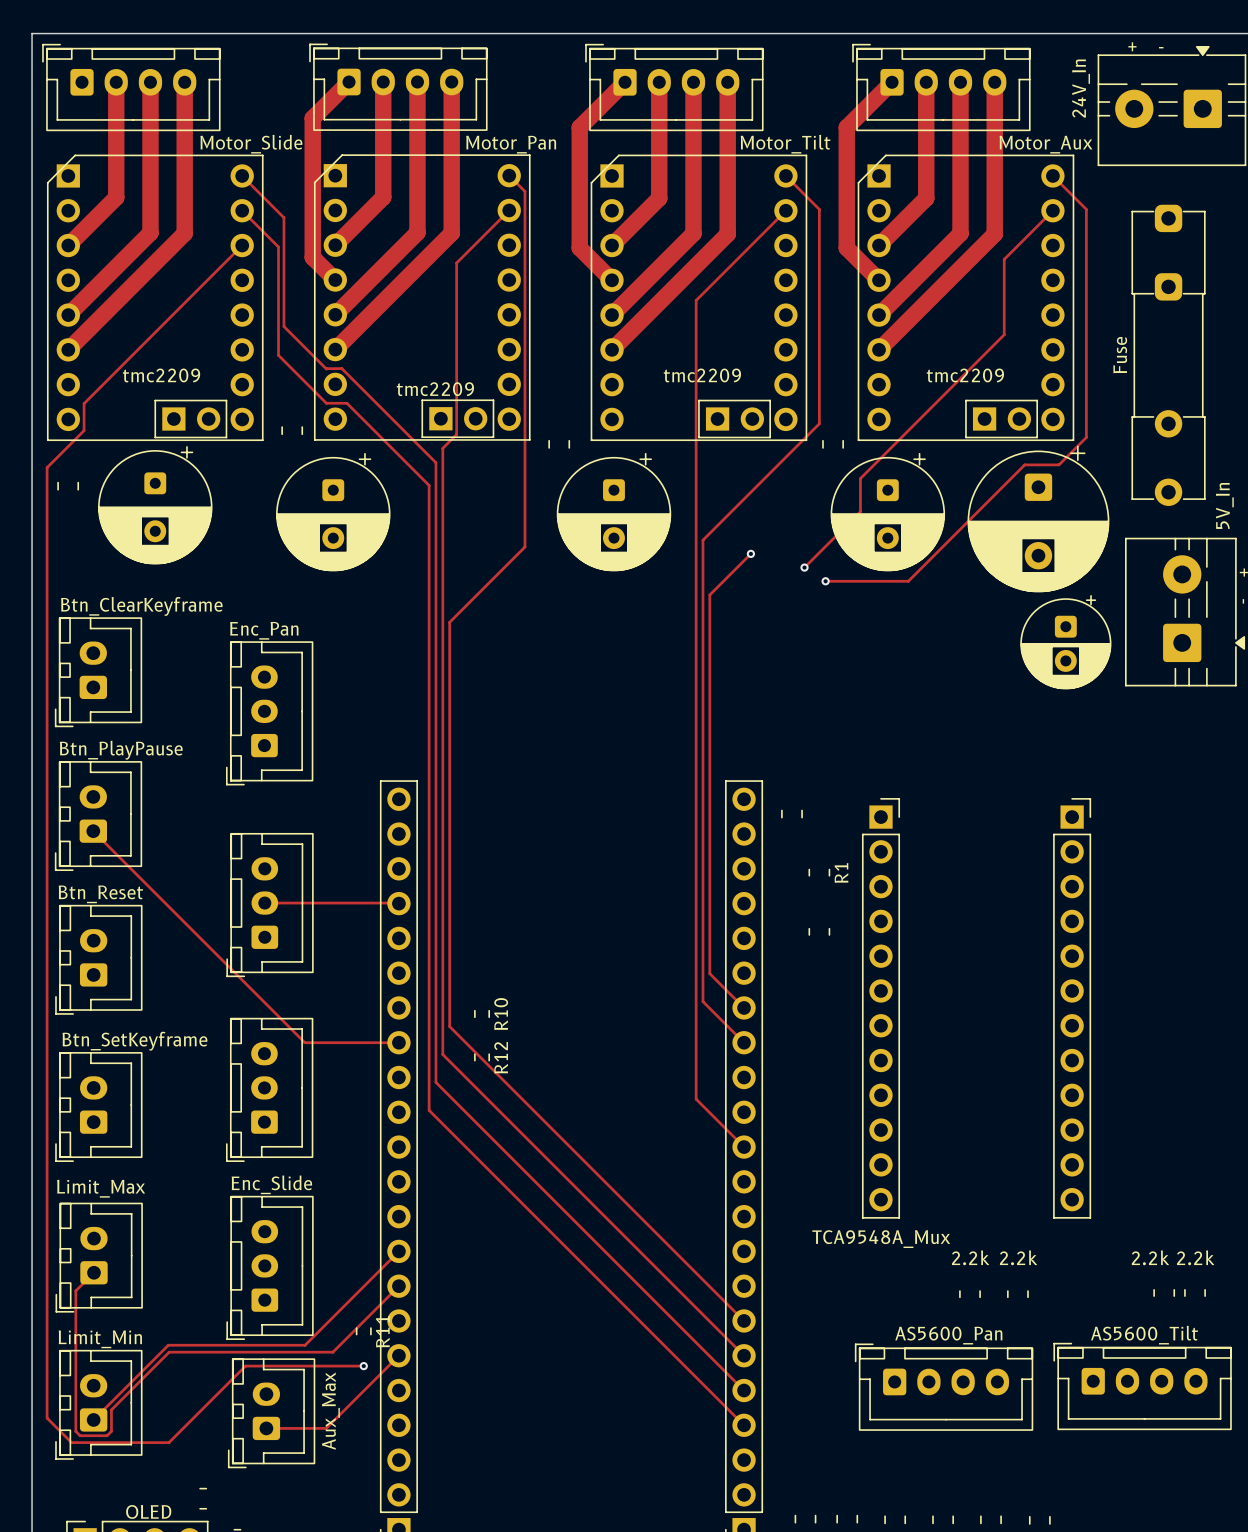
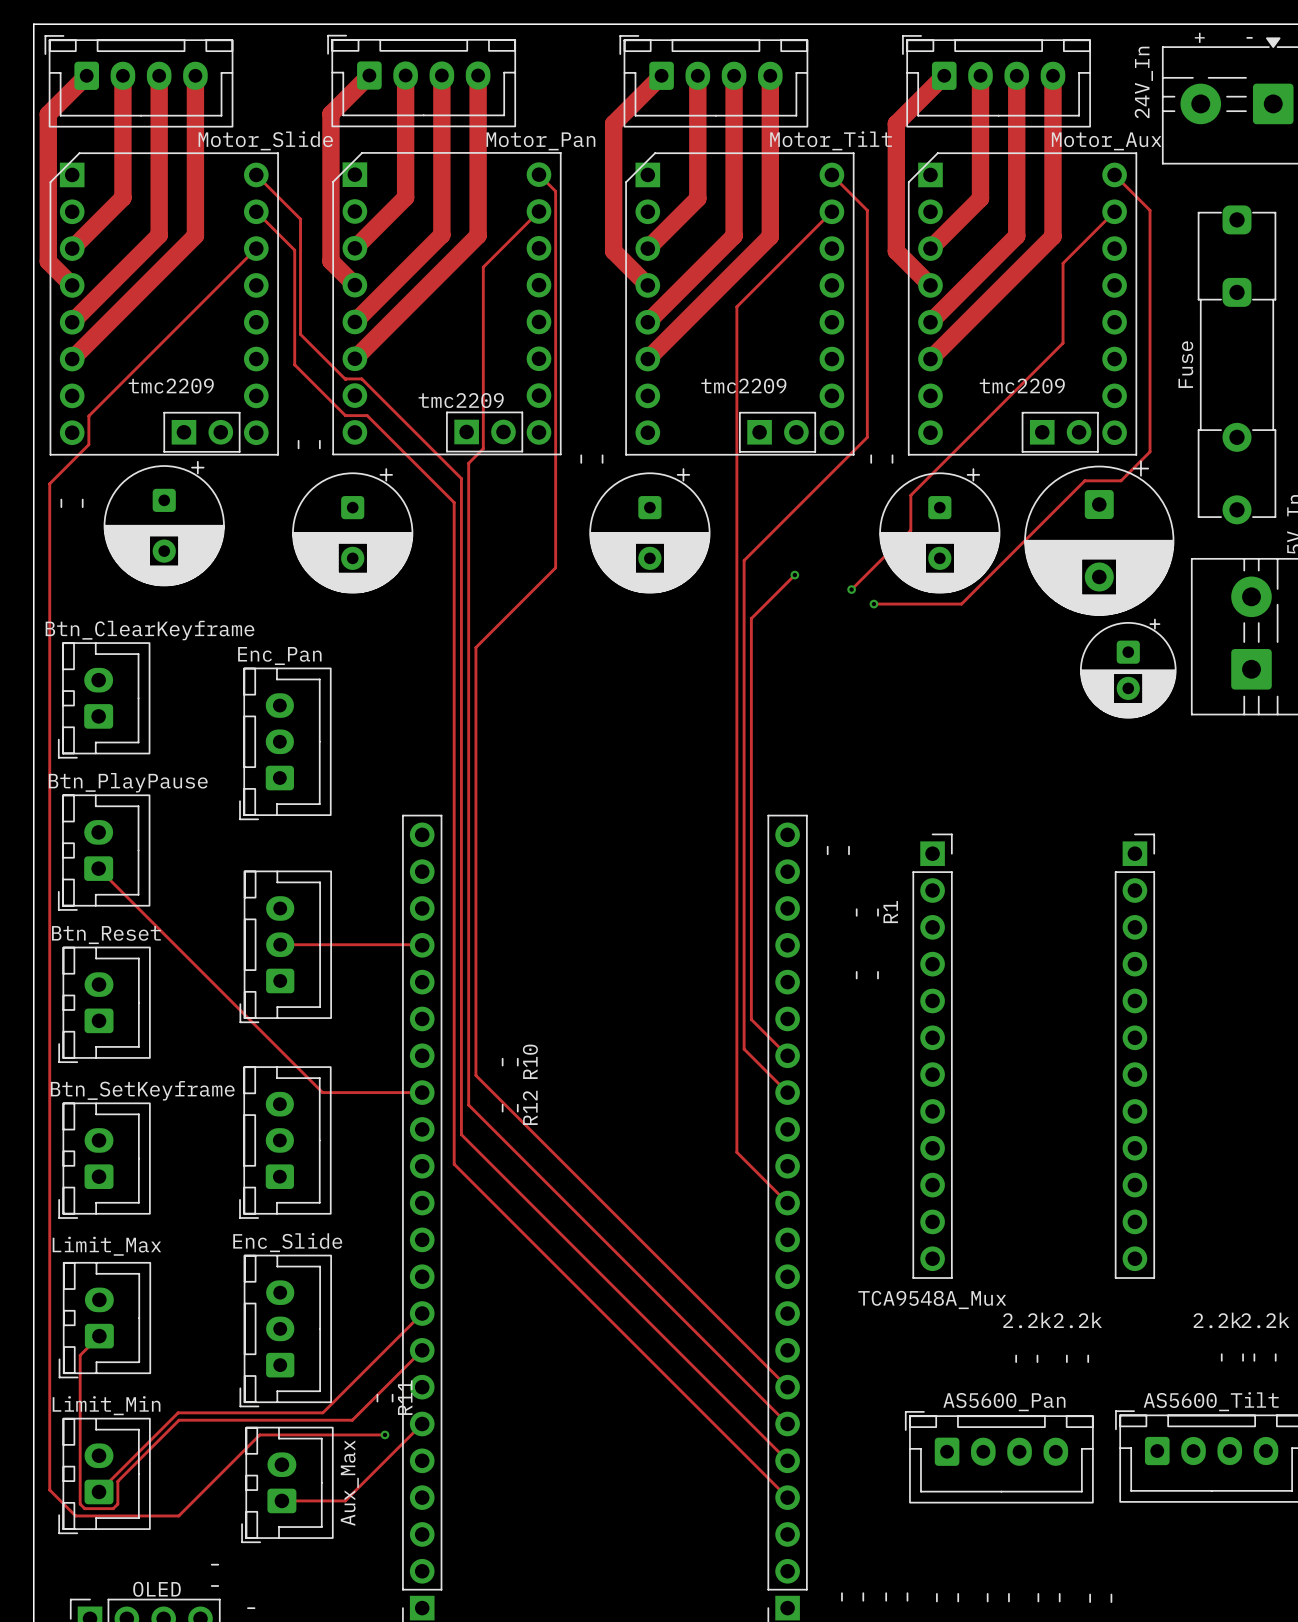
track: none -> (86, 75) (48, 114) (48, 261) (72, 285)

